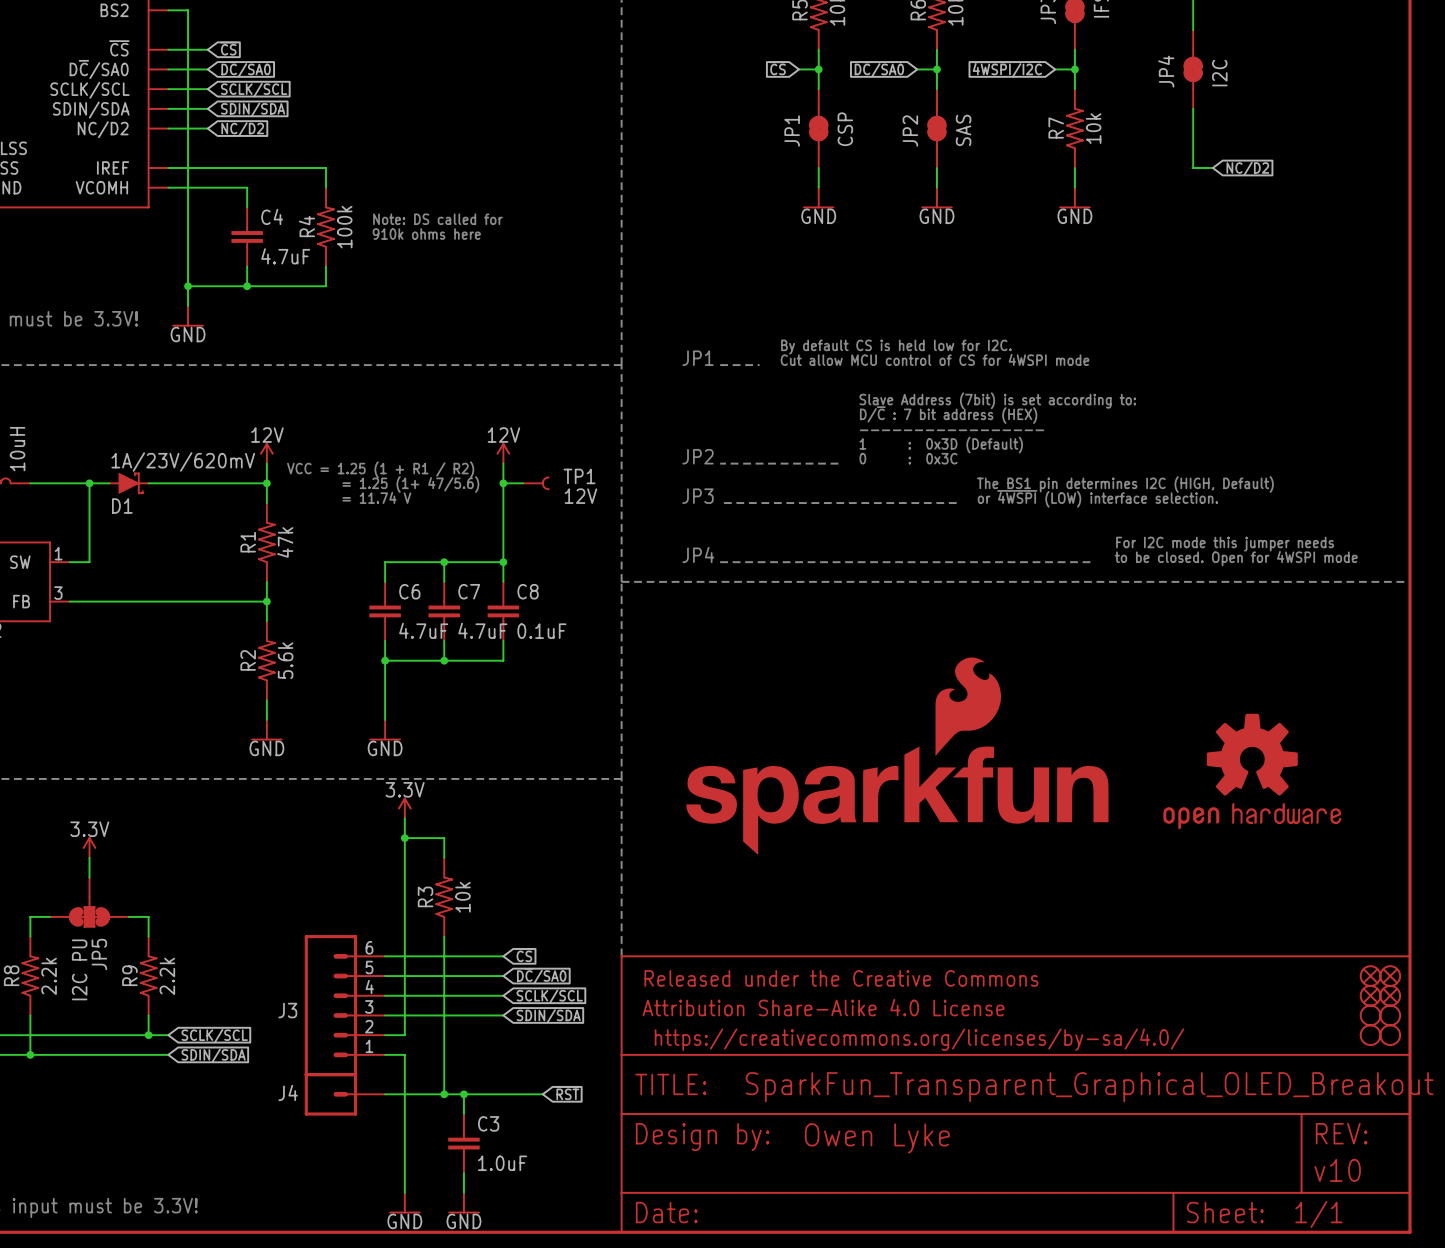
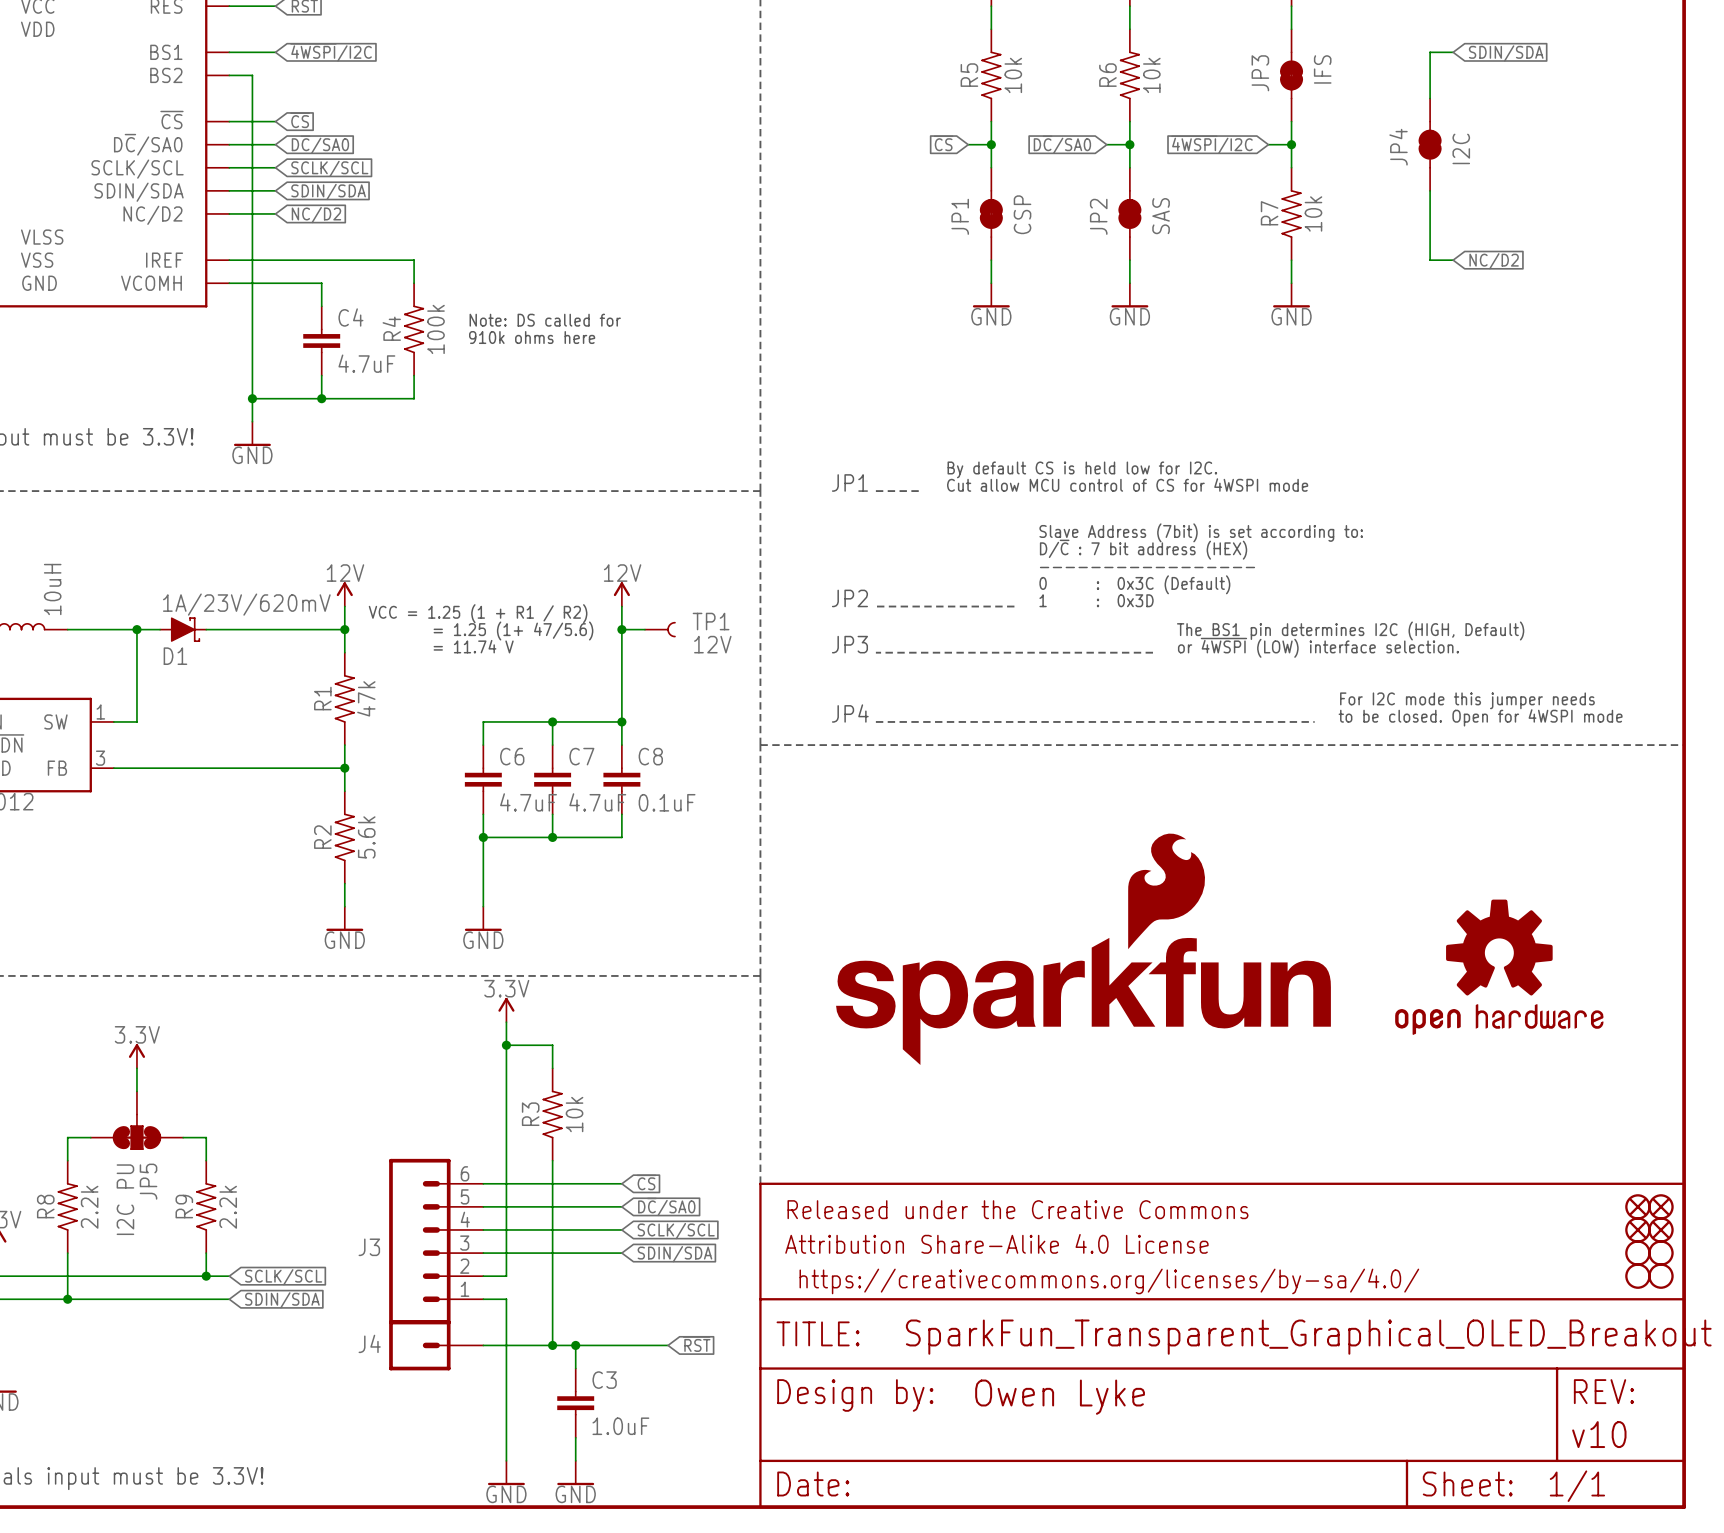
text: 1 : 0x3D (Default) (941, 445) -> 0 : 0x3C (Default) (1134, 584)
text: 0 : 0x3C (908, 458) -> 1 : 0x3D (1096, 600)

